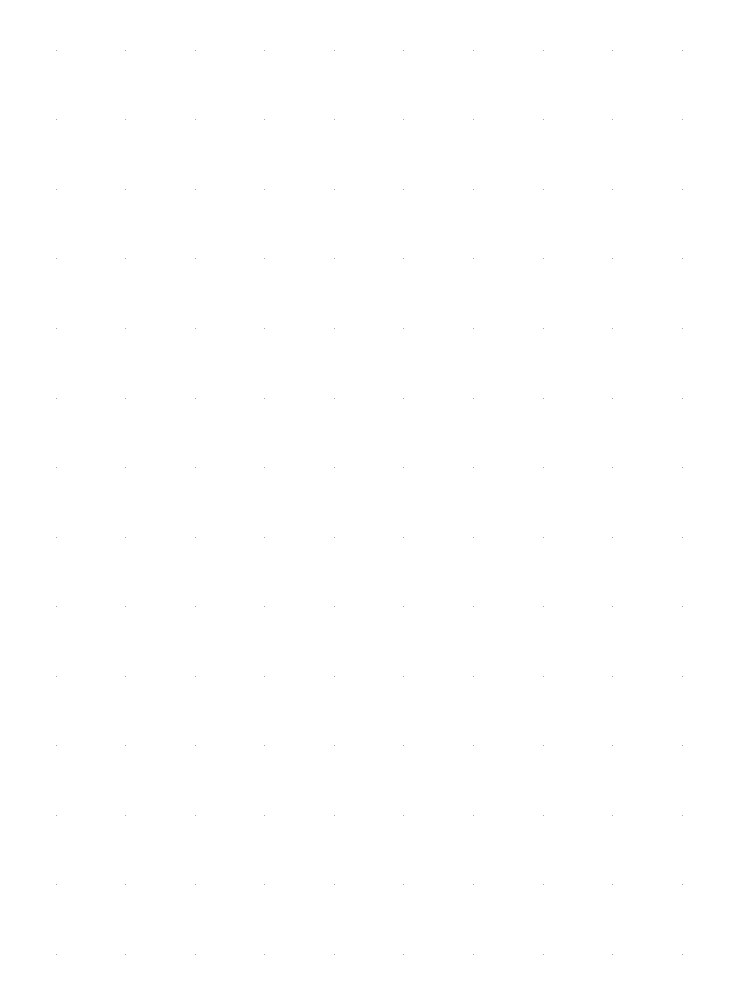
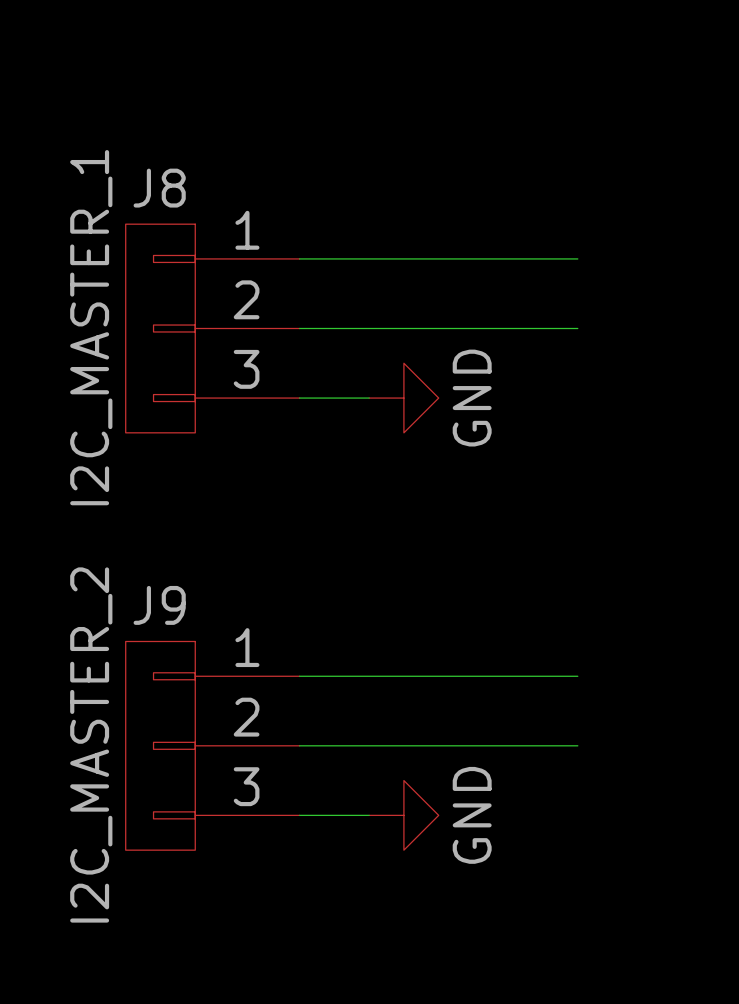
wire: none -> (299, 258) (577, 258)
J8: none -> I2C_MASTER_1 (212, 328)
wire: none -> (299, 328) (577, 328)
wire: none -> (299, 398) (369, 398)
power symbol: none -> GND (403, 398)
wire: none -> (299, 676) (577, 676)
J9: none -> I2C_MASTER_2 (212, 745)
wire: none -> (299, 745) (577, 745)
wire: none -> (299, 815) (369, 815)
power symbol: none -> GND (403, 815)

